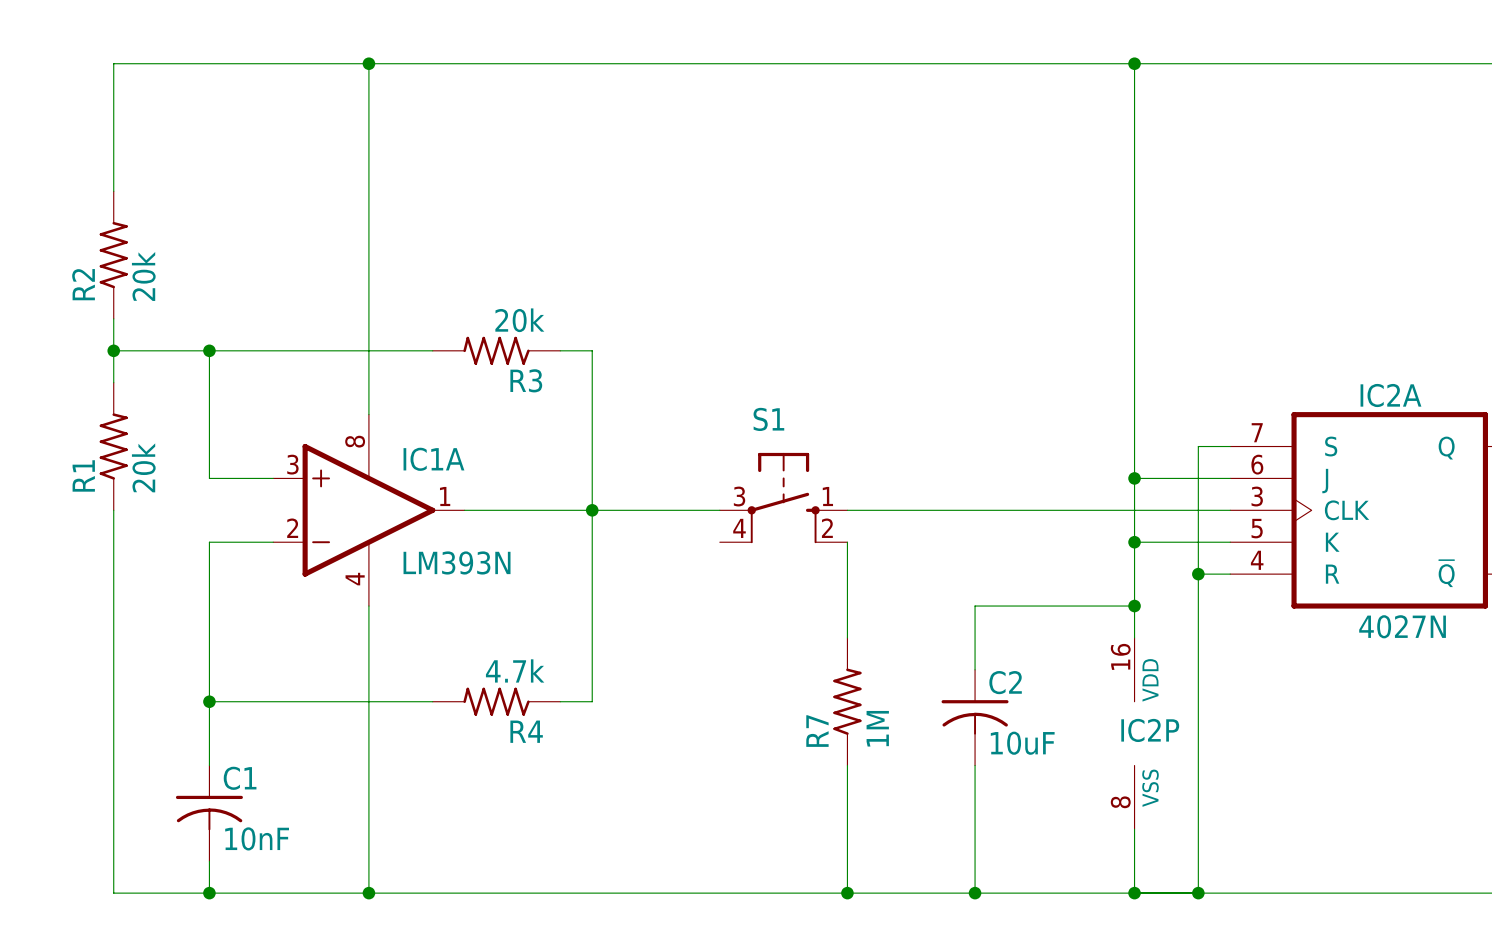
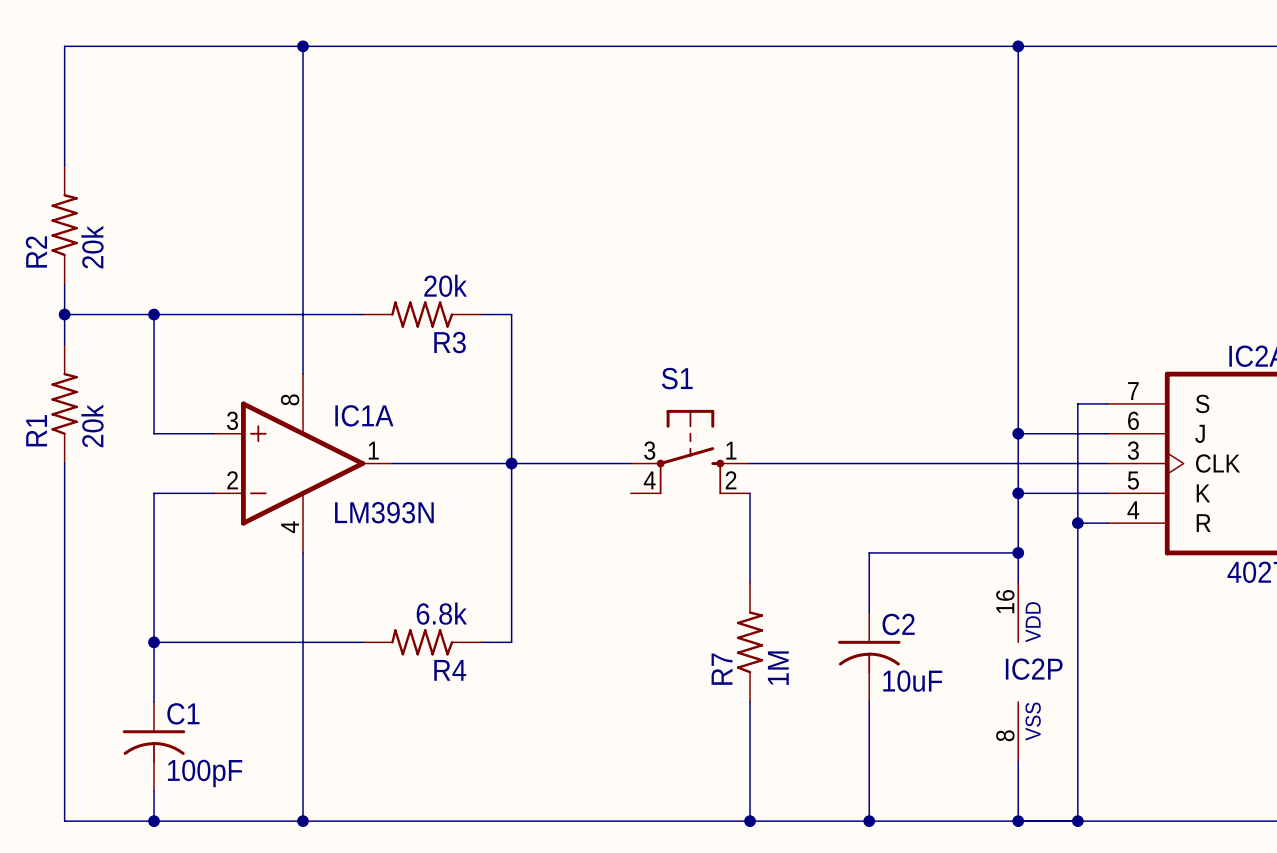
R4 value: 4.7k (515, 670) -> 6.8k (441, 613)
C1 value: 10nF (257, 838) -> 100pF (205, 773)

